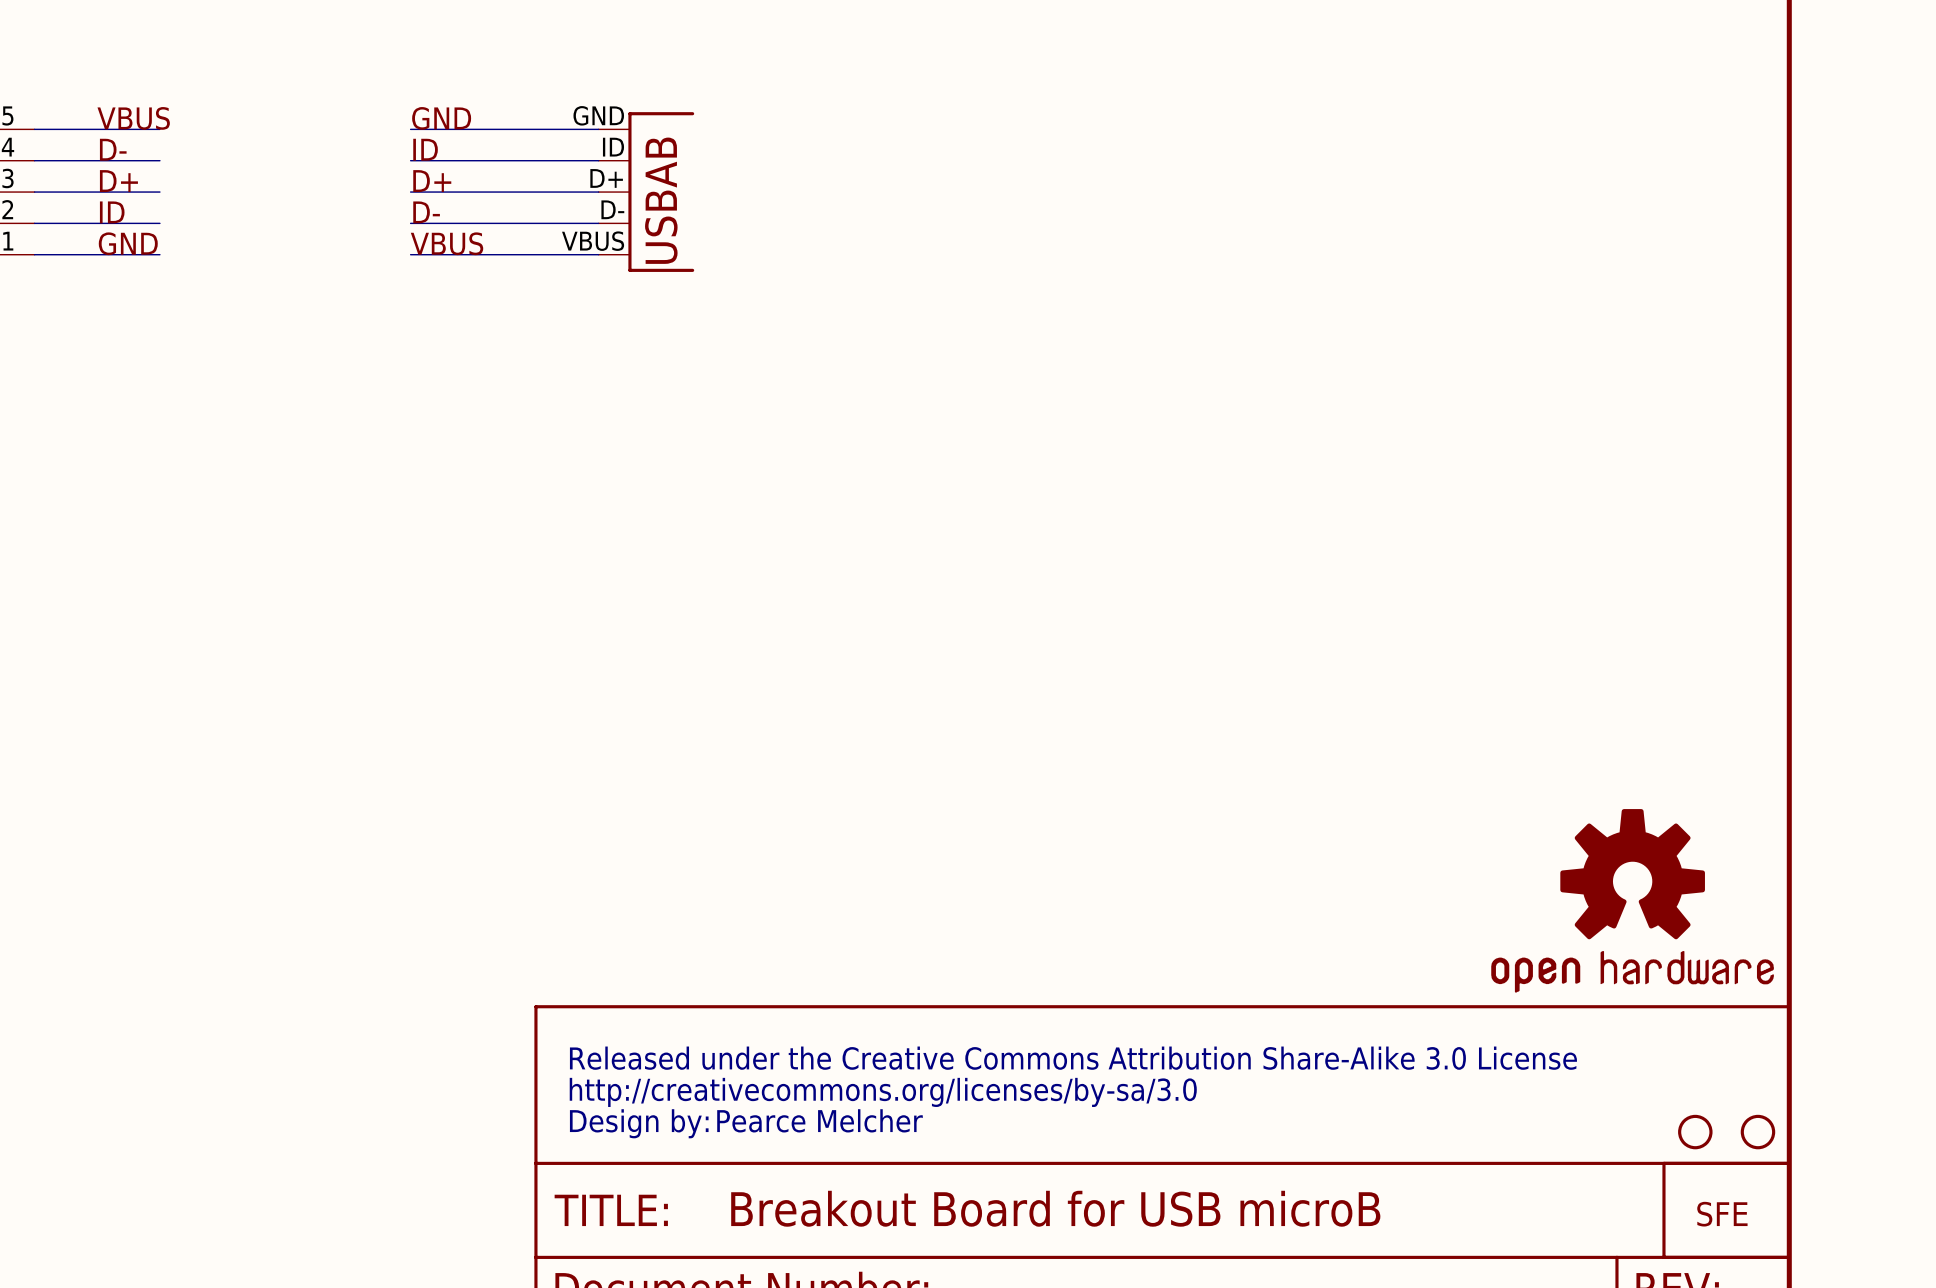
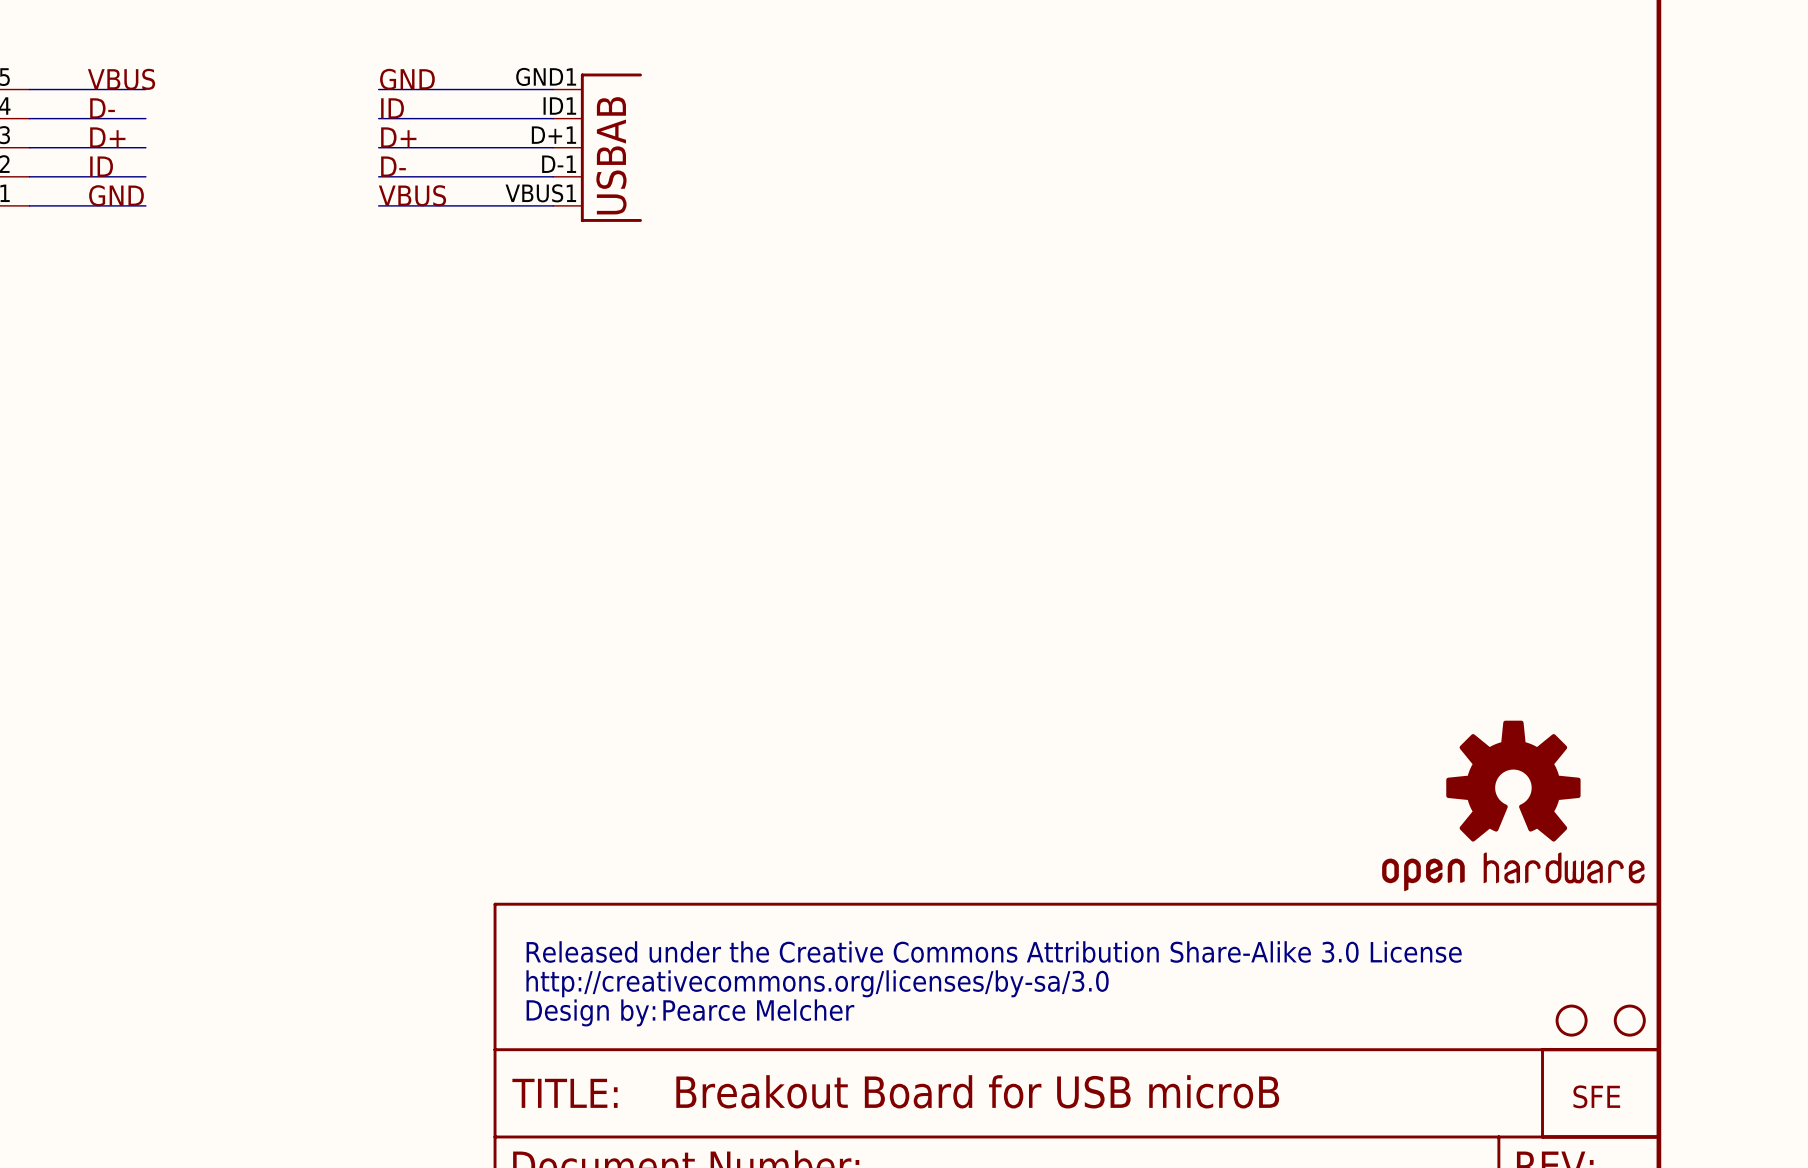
part pin number: GND (598, 115) -> GND1 (546, 76)
part pin number: ID (613, 147) -> ID1 (559, 106)
part pin number: D+ (606, 178) -> D+1 (553, 135)
part pin number: D- (612, 209) -> D-1 (559, 164)
part pin number: VBUS (593, 241) -> VBUS1 (540, 193)

